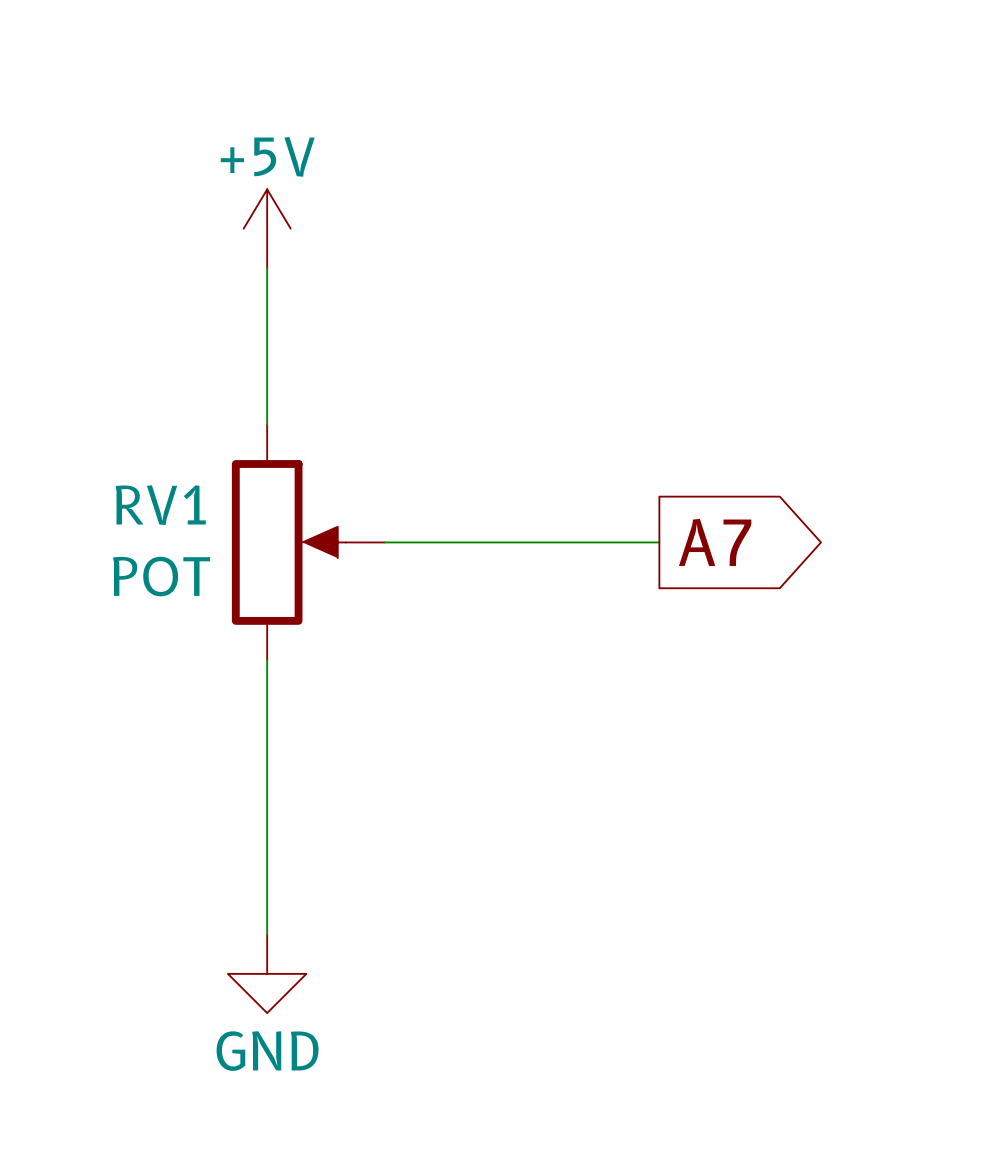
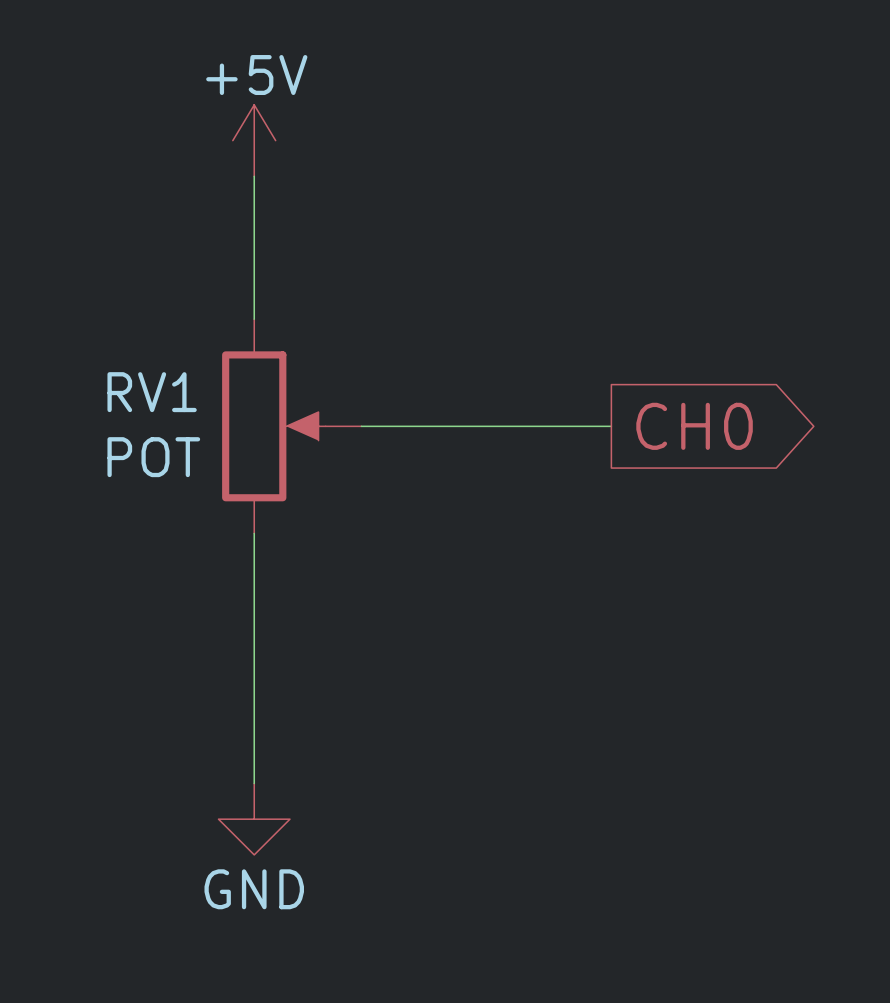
global label: A7 (715, 542) -> CH0 (694, 426)

